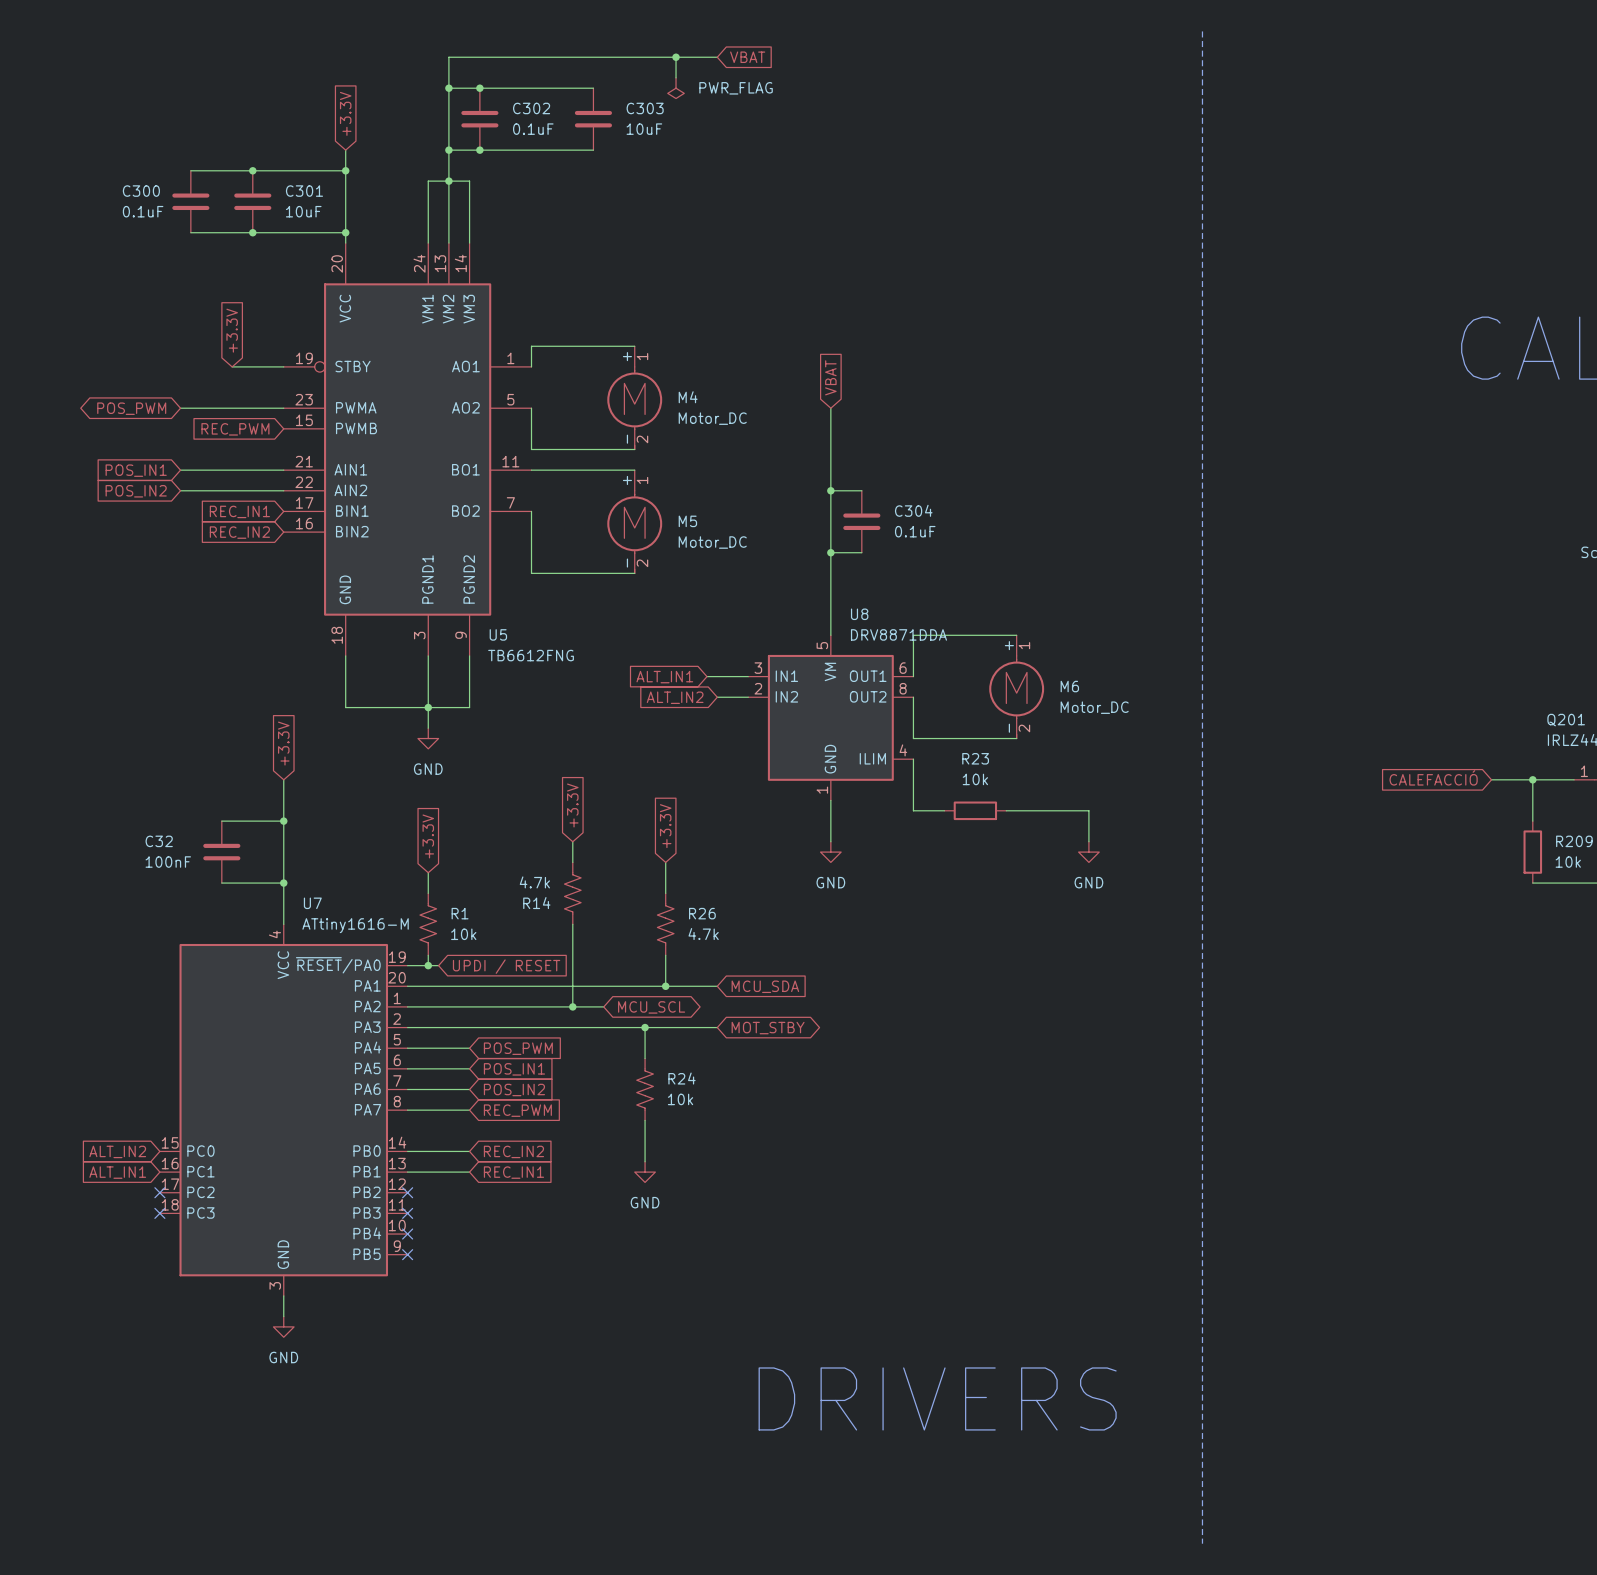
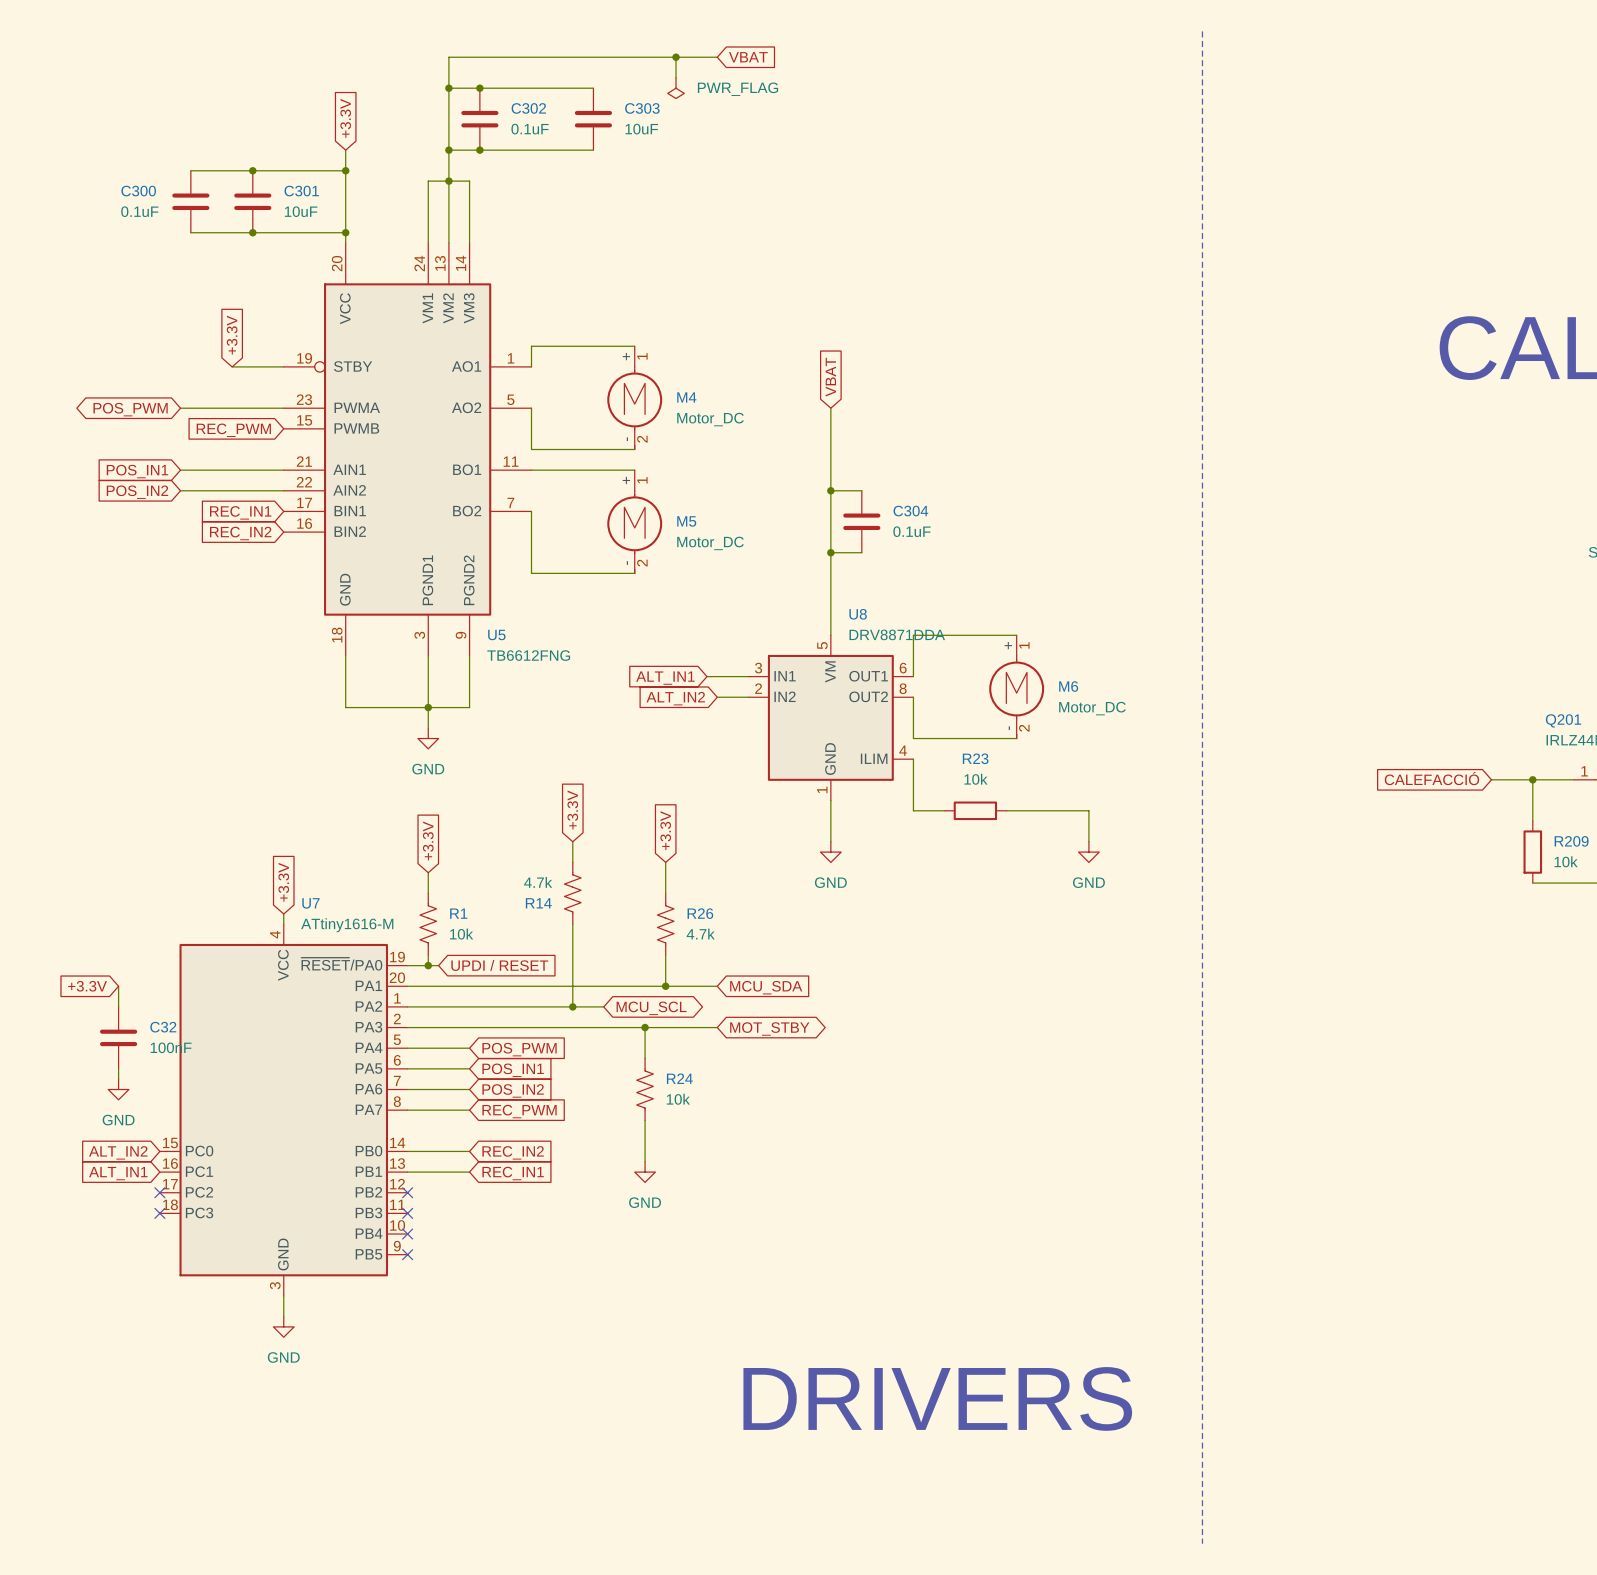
global label: +3.3V (283, 743) -> none
wire: (283, 779) (283, 914) -> none
wire: (221, 821) (283, 821) -> none
junction: (283, 821) -> none
C32 name position: C32 (159, 841) -> C32 (163, 1027)
C32 position: (221, 852) -> (118, 1037)
C32 value position: 100nF (168, 862) -> 100nF (171, 1047)
global label: none -> +3.3V (283, 882)
wire: (221, 883) (283, 883) -> none
junction: (283, 883) -> none
global label: none -> +3.3V (87, 986)
wire: none -> (118, 986) (118, 1006)
wire: none -> (118, 1068) (118, 1079)
power symbol: none -> GND (118, 1089)

